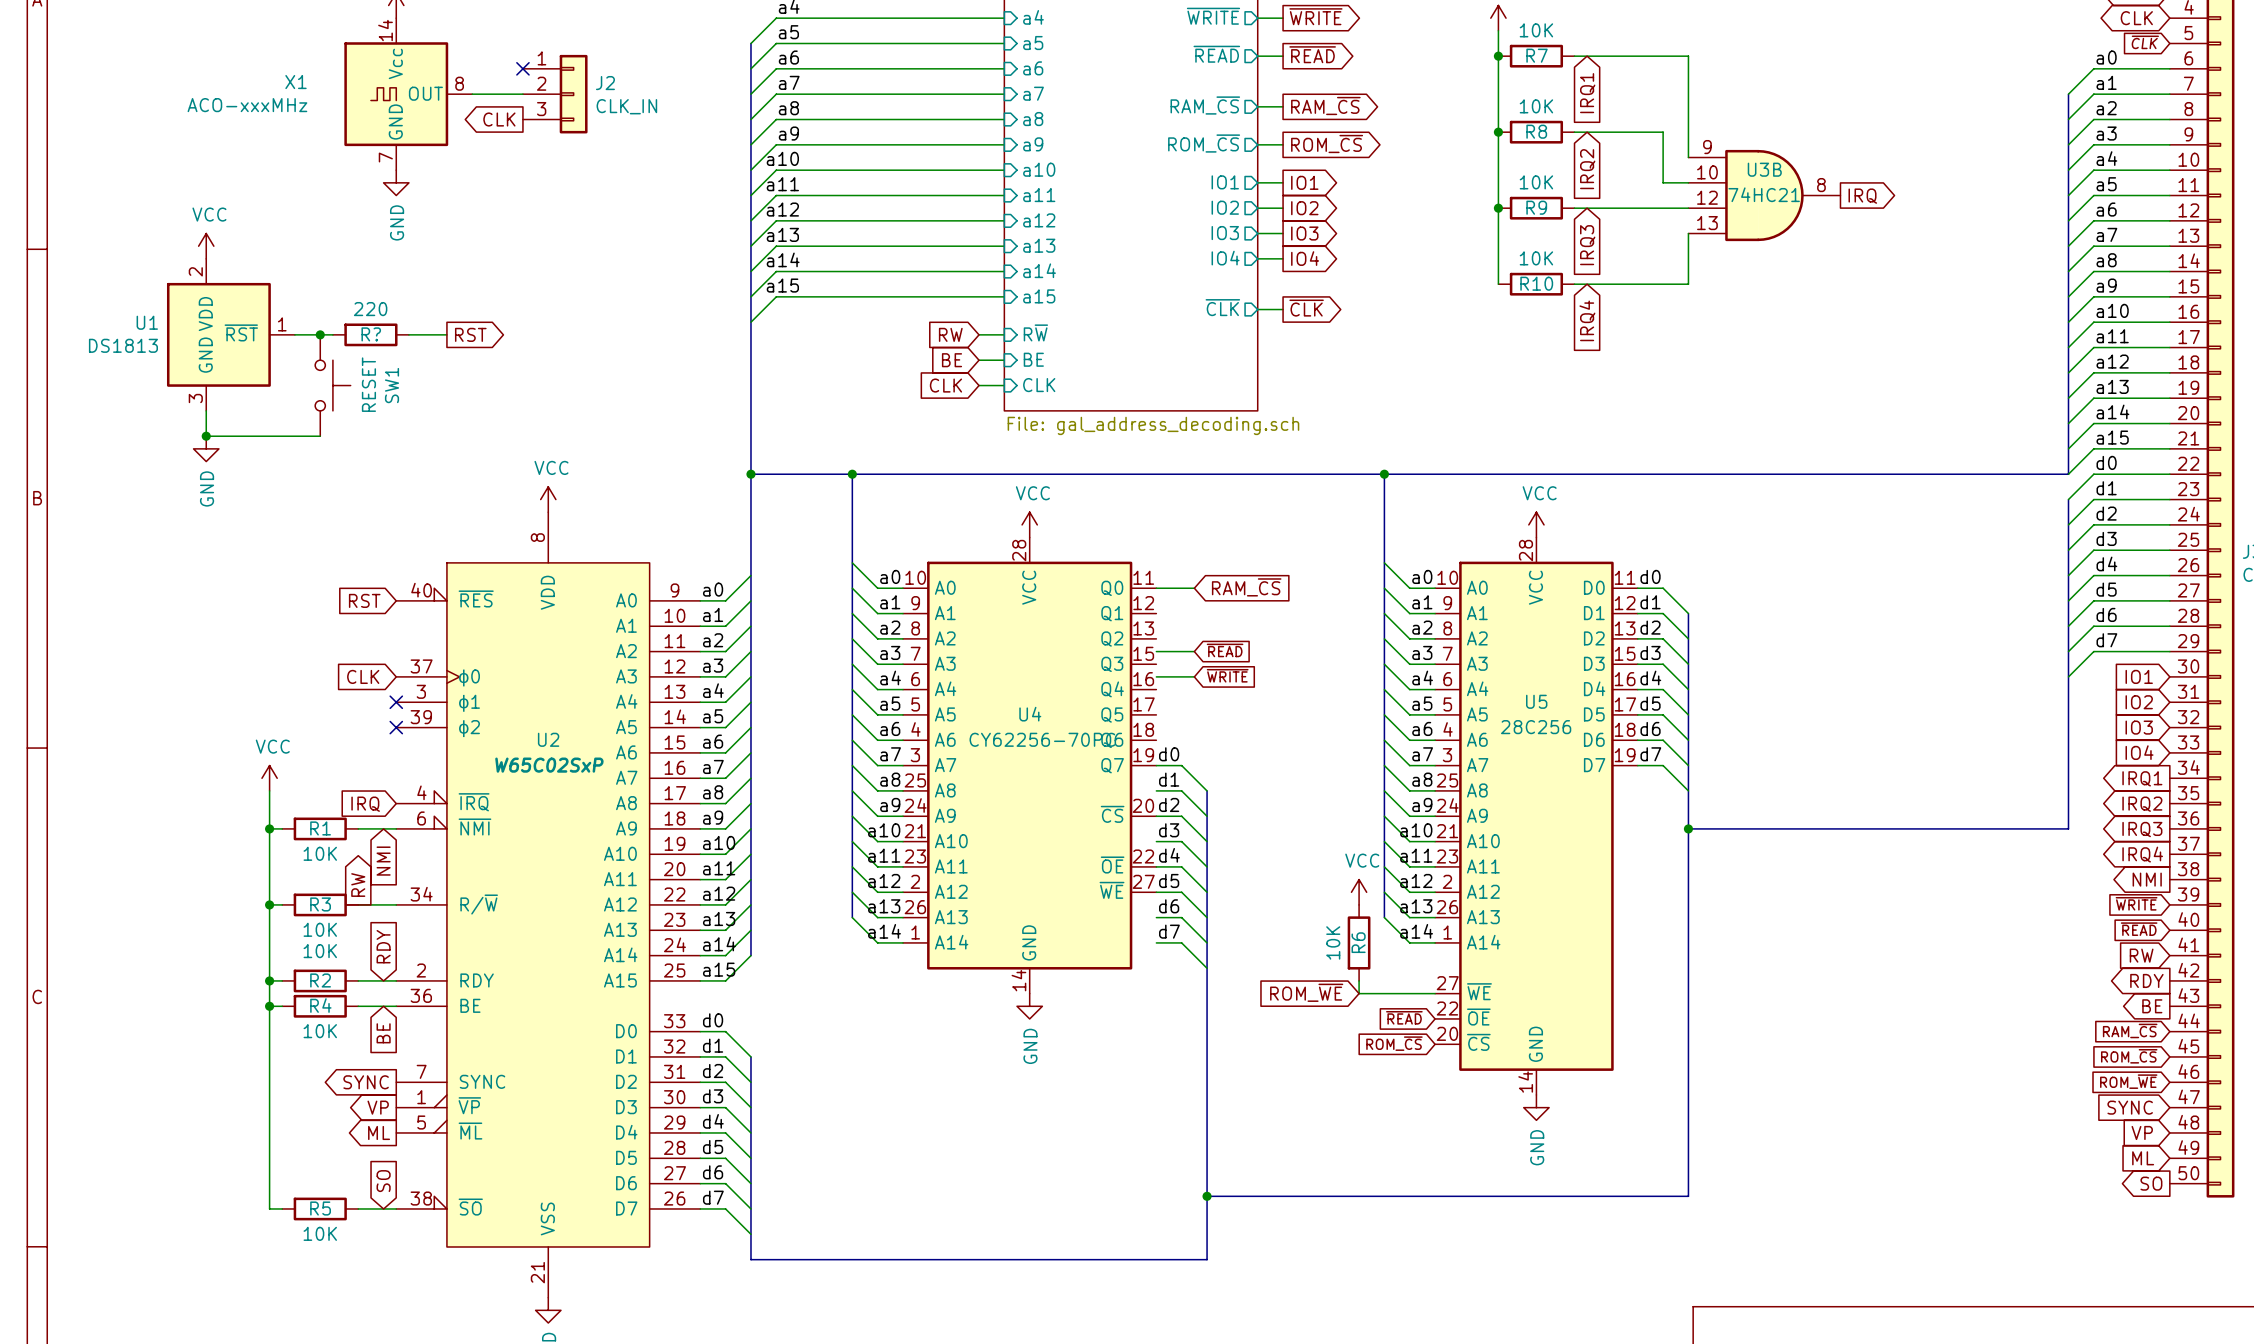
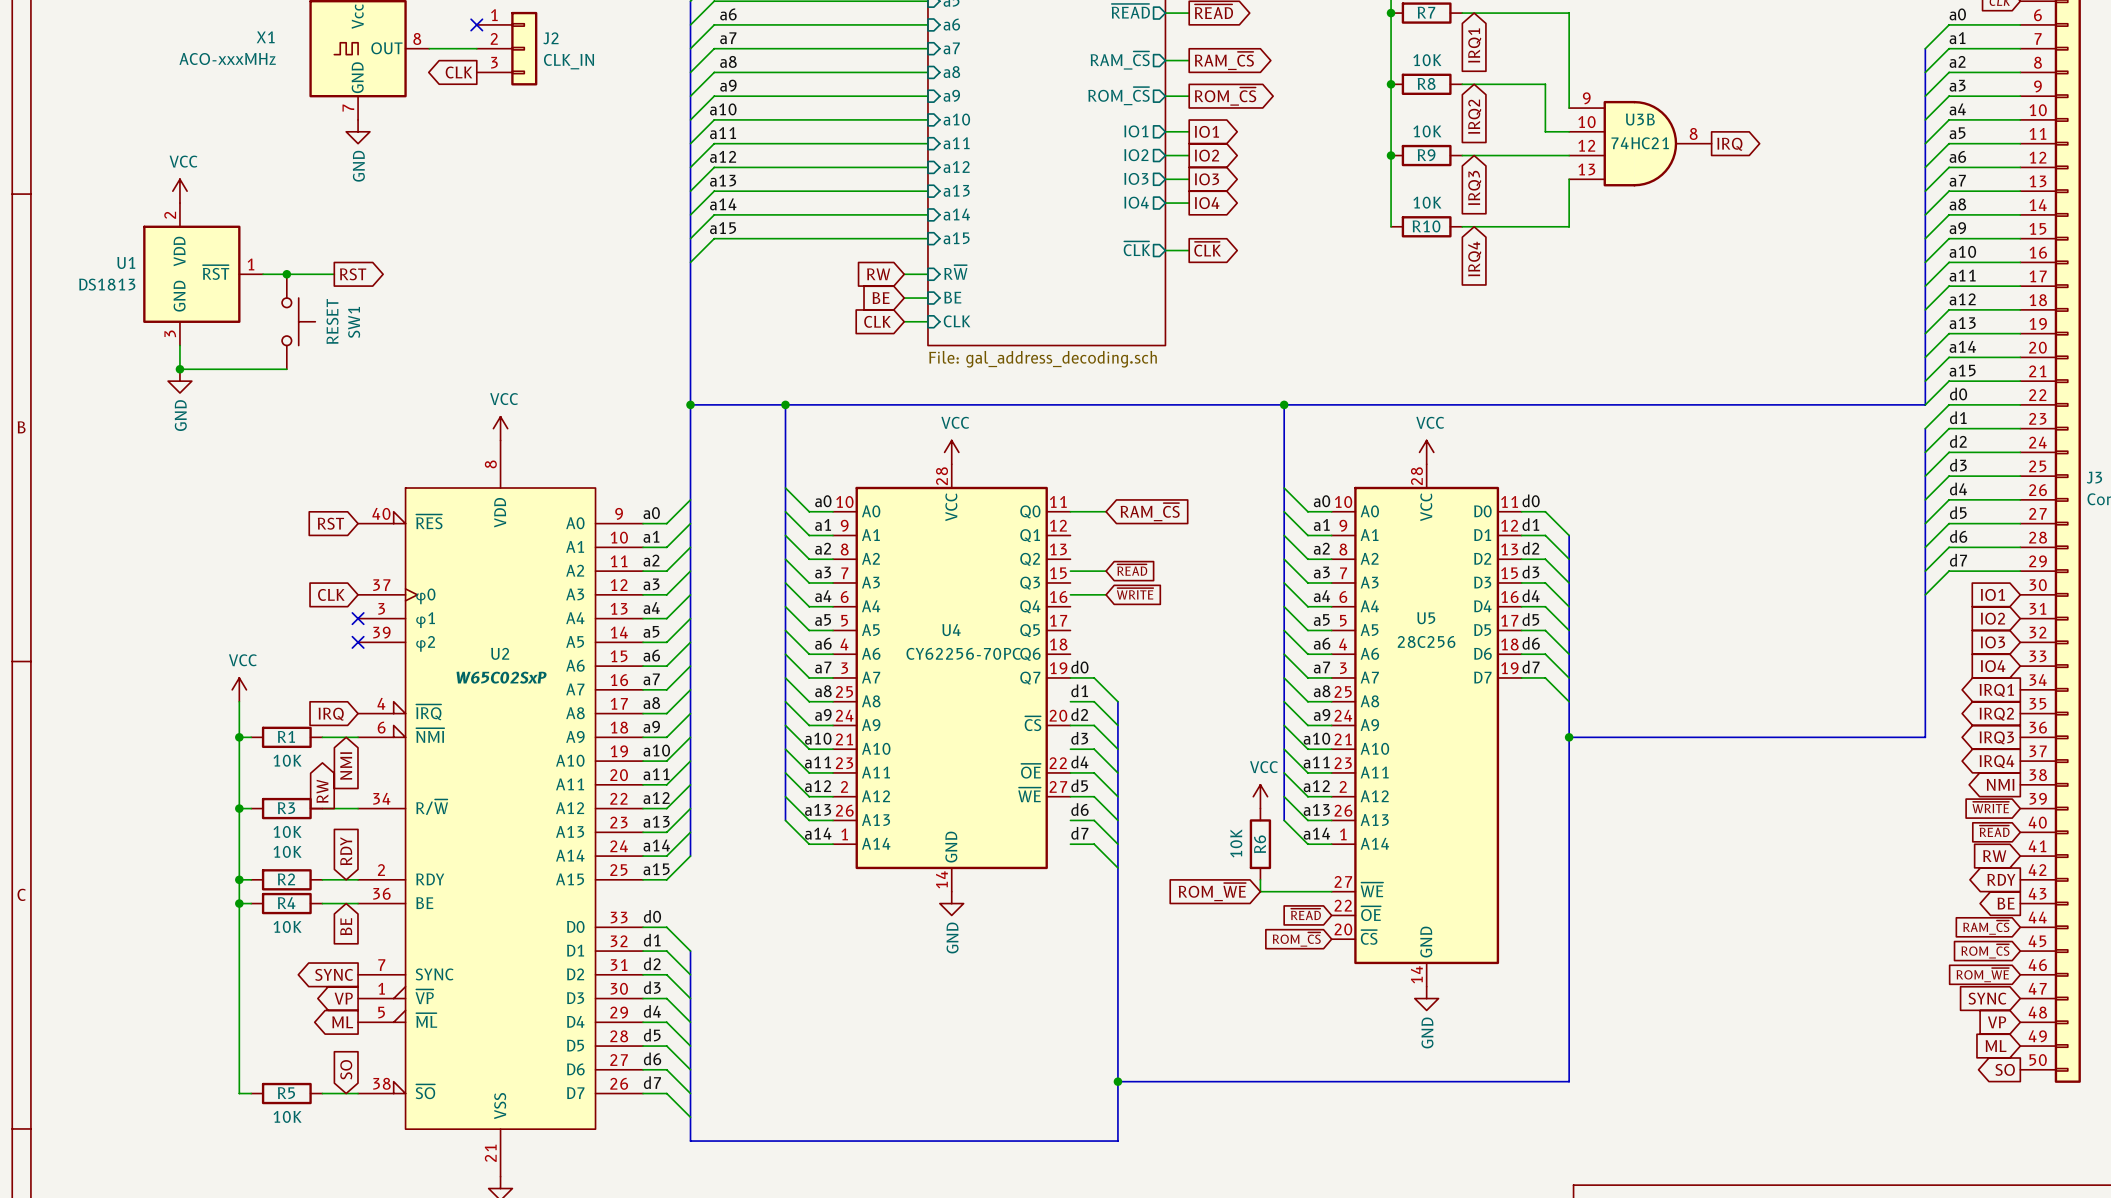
R?: 220 (370, 334) -> none
wire: (408, 334) (446, 334) -> (298, 274) (334, 274)
global label position: RST (470, 334) -> RST (353, 274)

